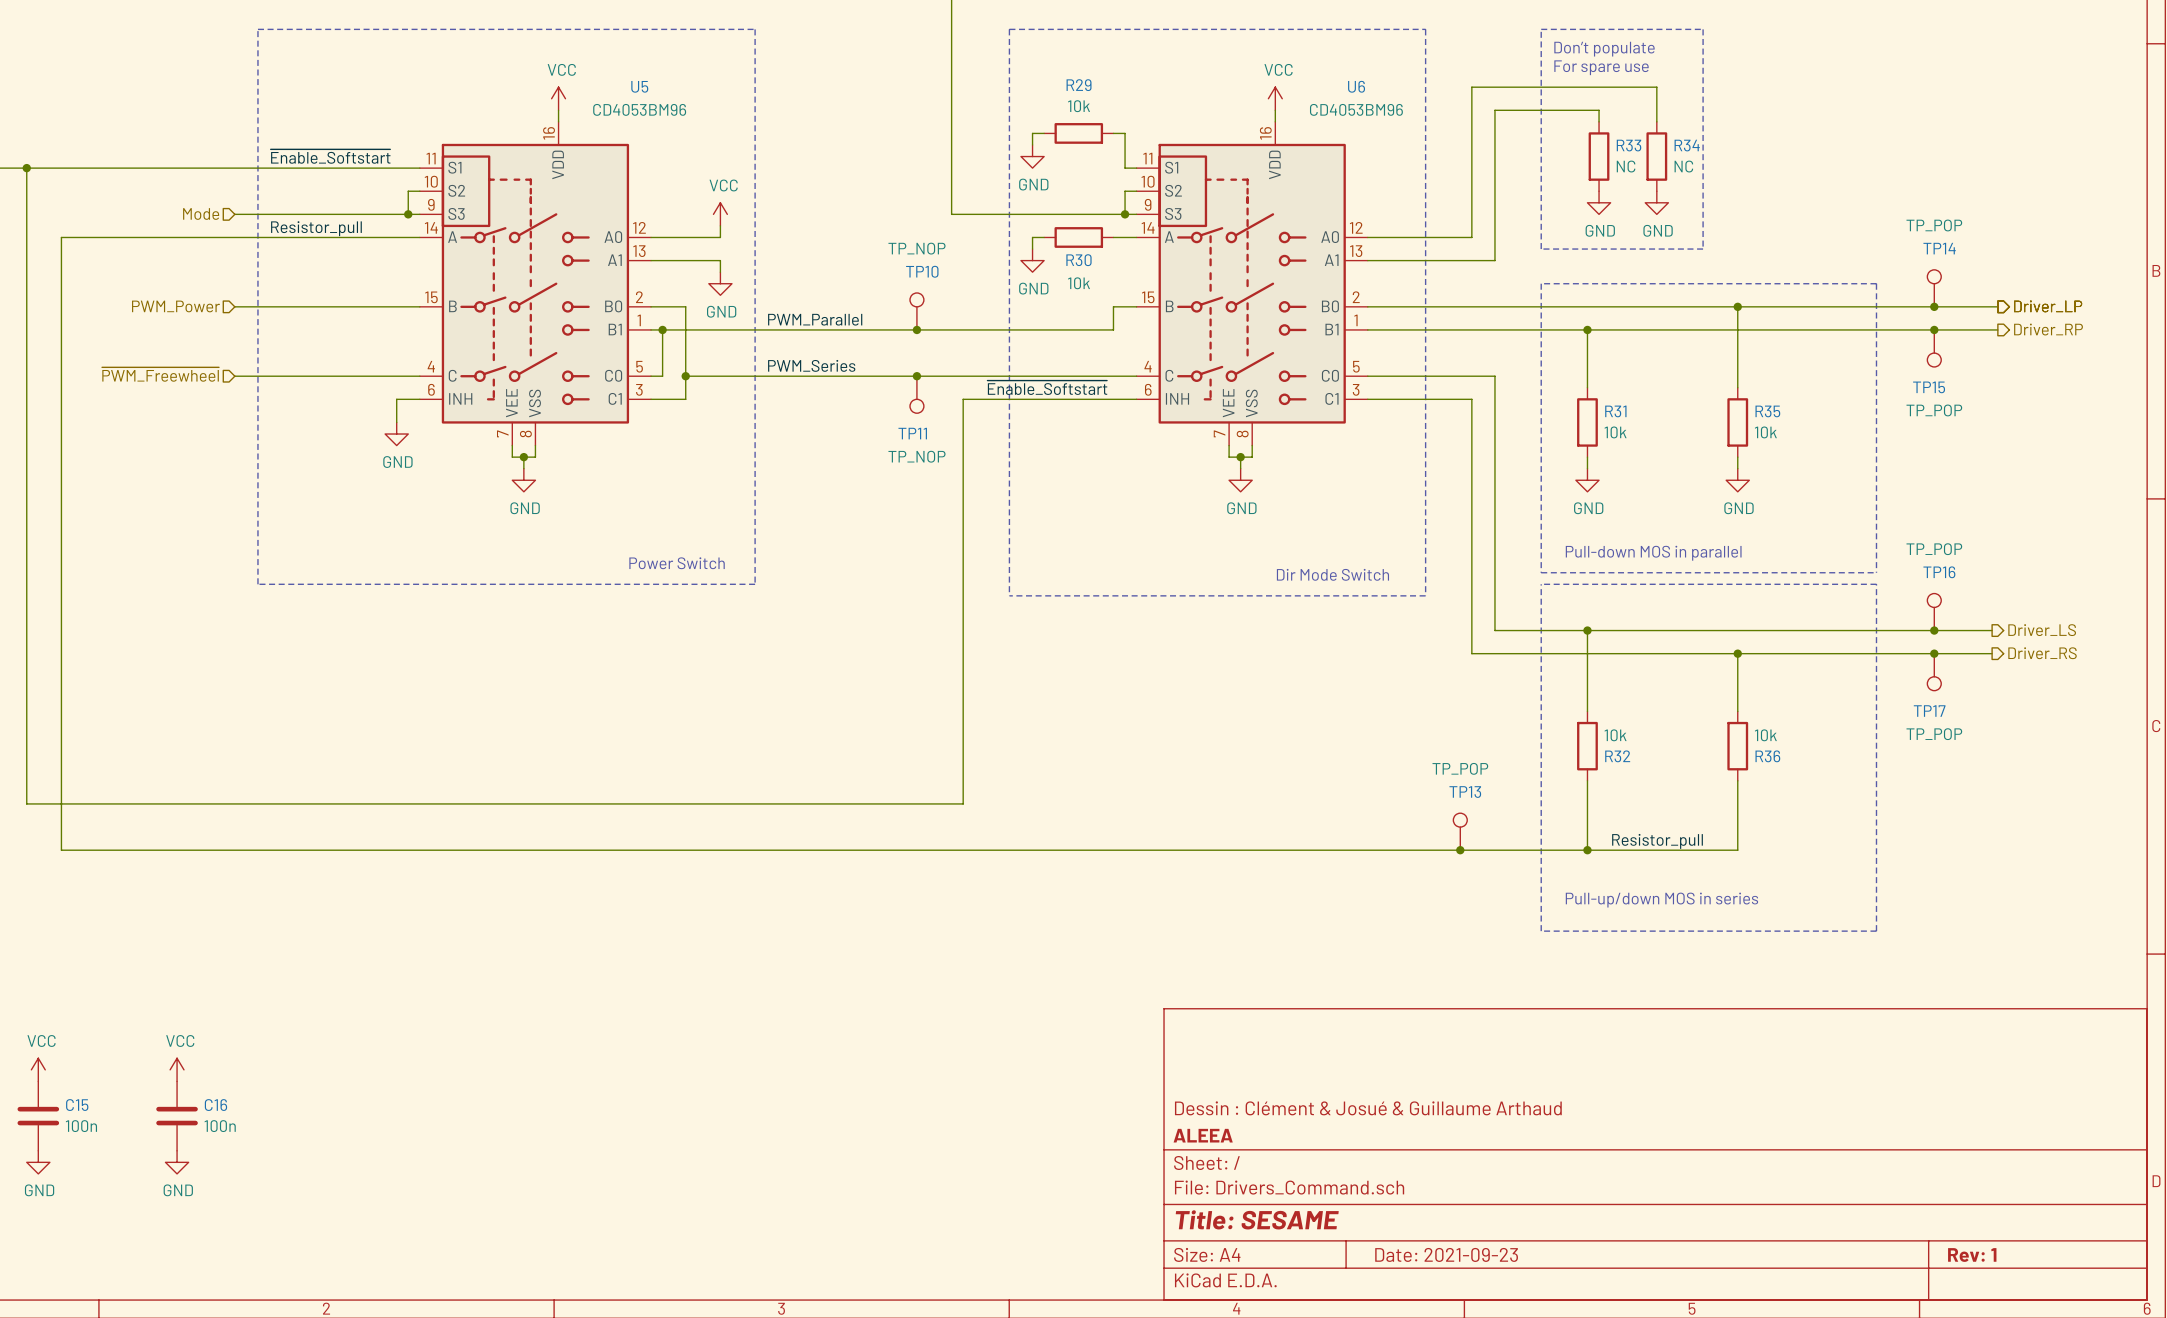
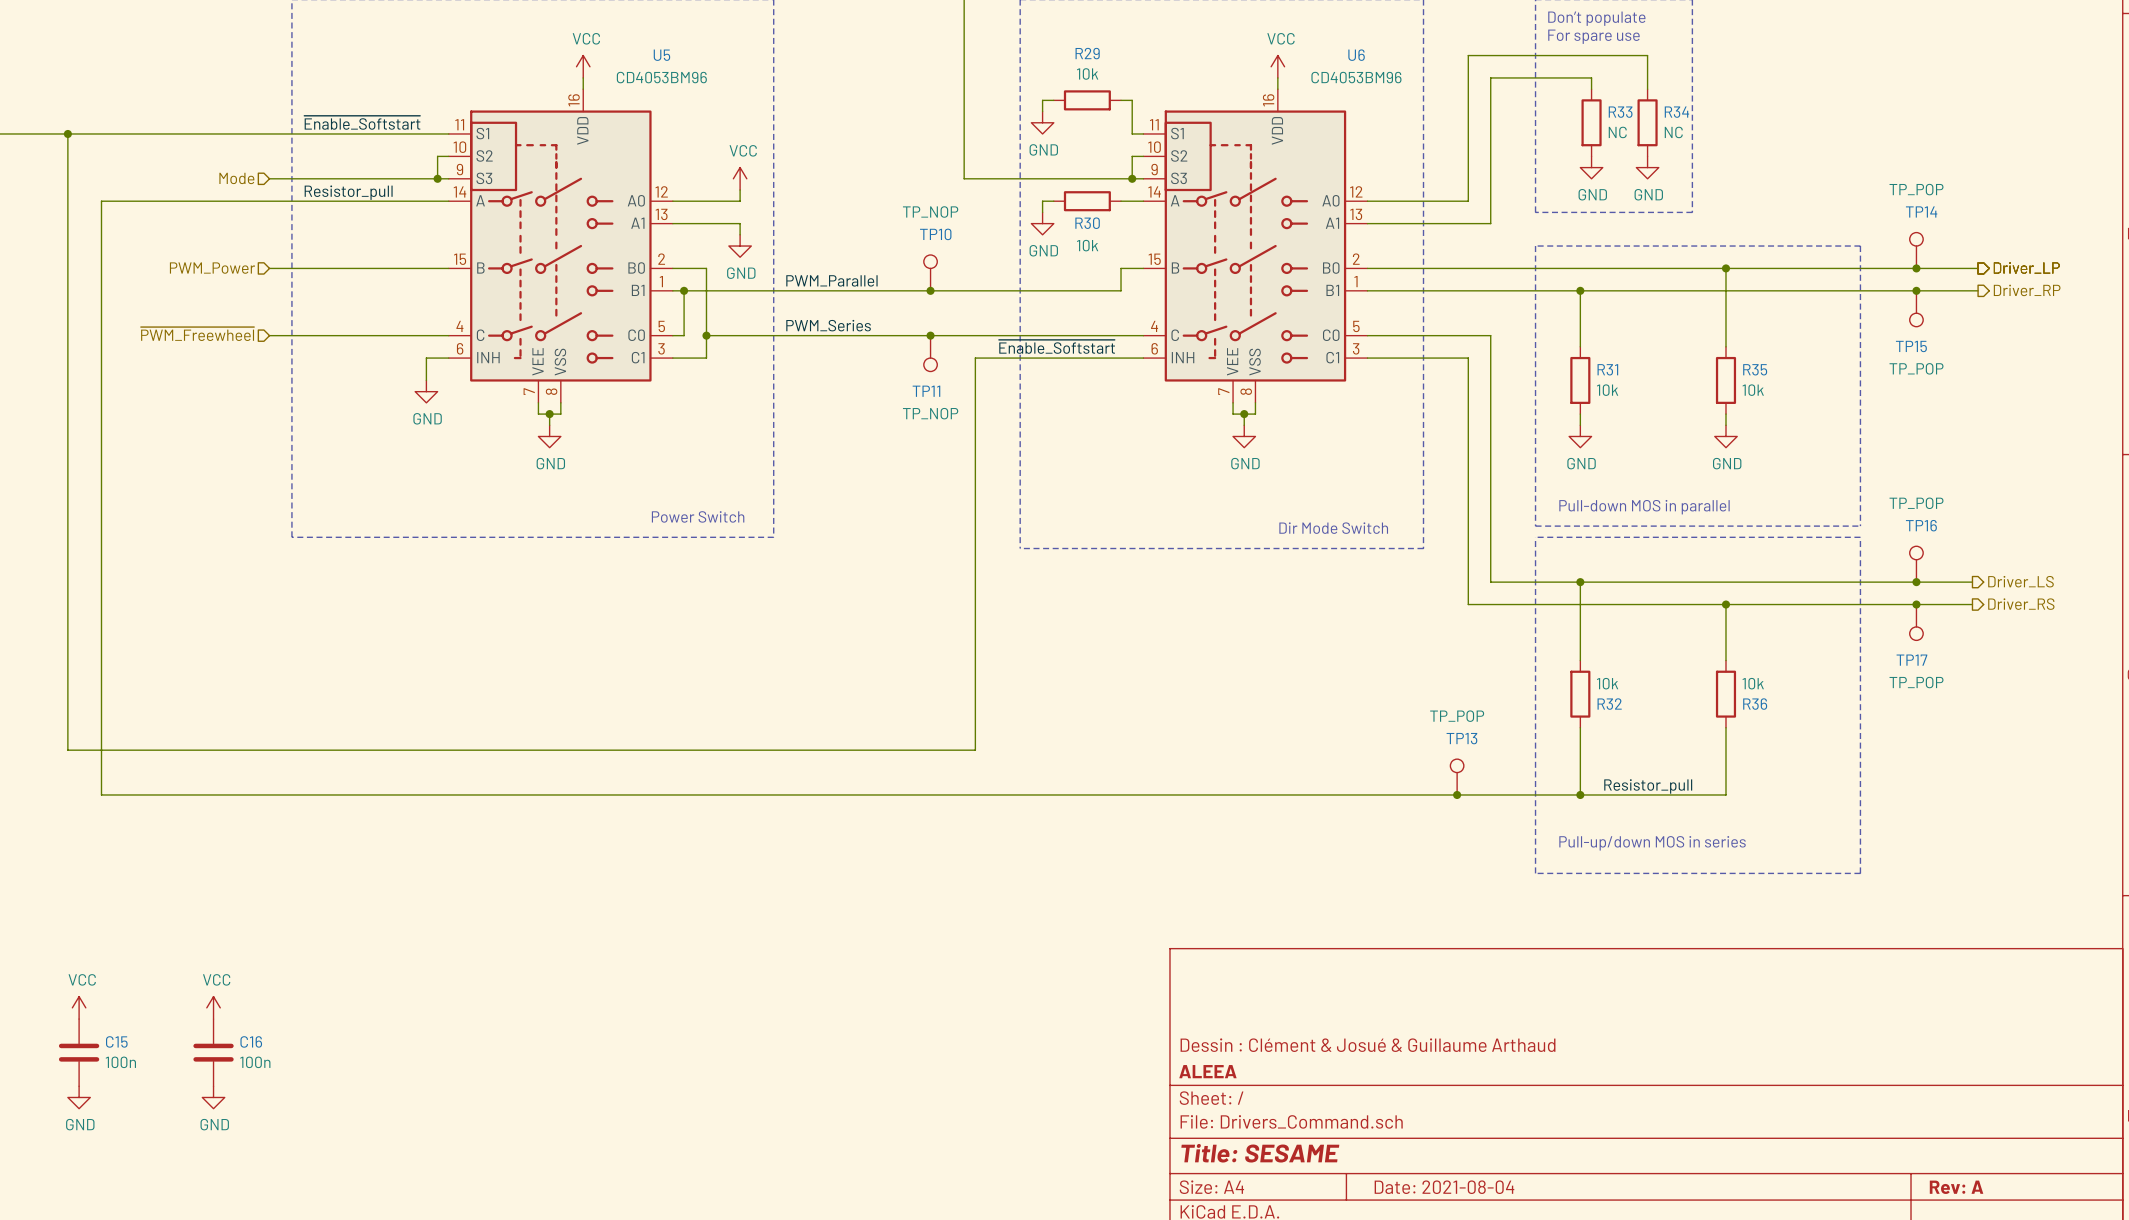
title block: Date: 2021-09-23 (1446, 1254) -> Date: 2021-08-04 (1444, 1187)
title block: Rev: 1 (1972, 1255) -> Rev: A (1956, 1187)

